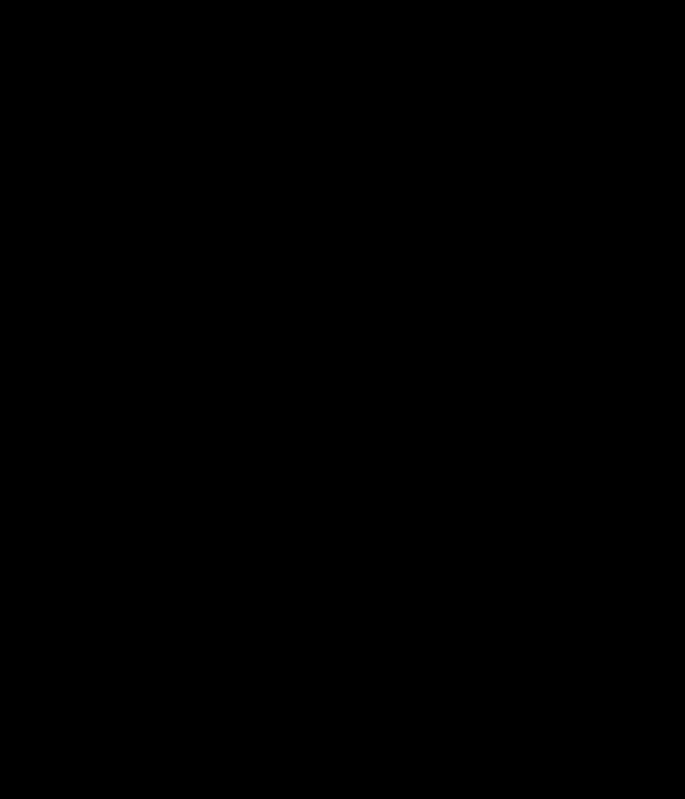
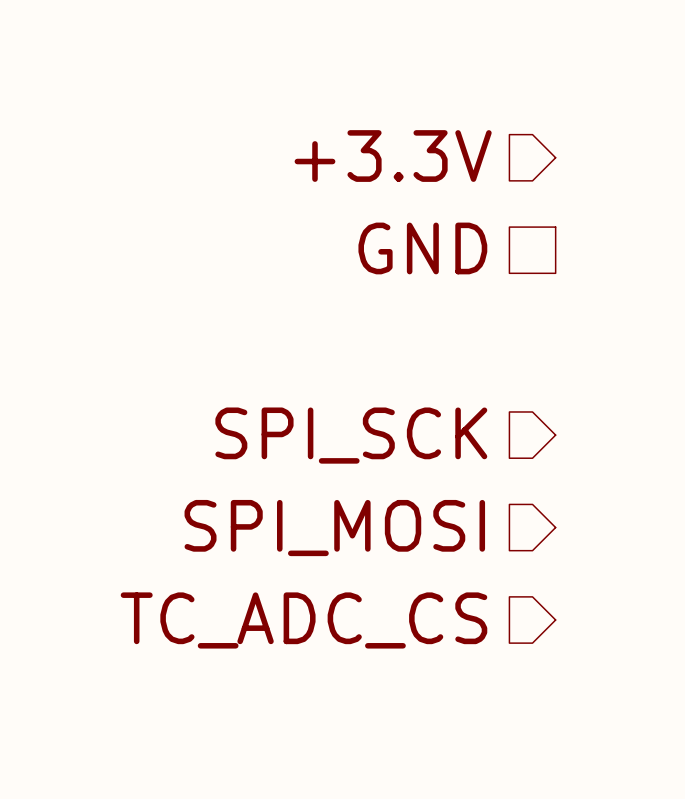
hierarchical label: none -> +3.3V (393, 156)
hierarchical label: none -> GND (422, 248)
hierarchical label: none -> SPI_SCK (351, 435)
hierarchical label: none -> SPI_MOSI (334, 528)
hierarchical label: none -> TC_ADC_CS (303, 620)

